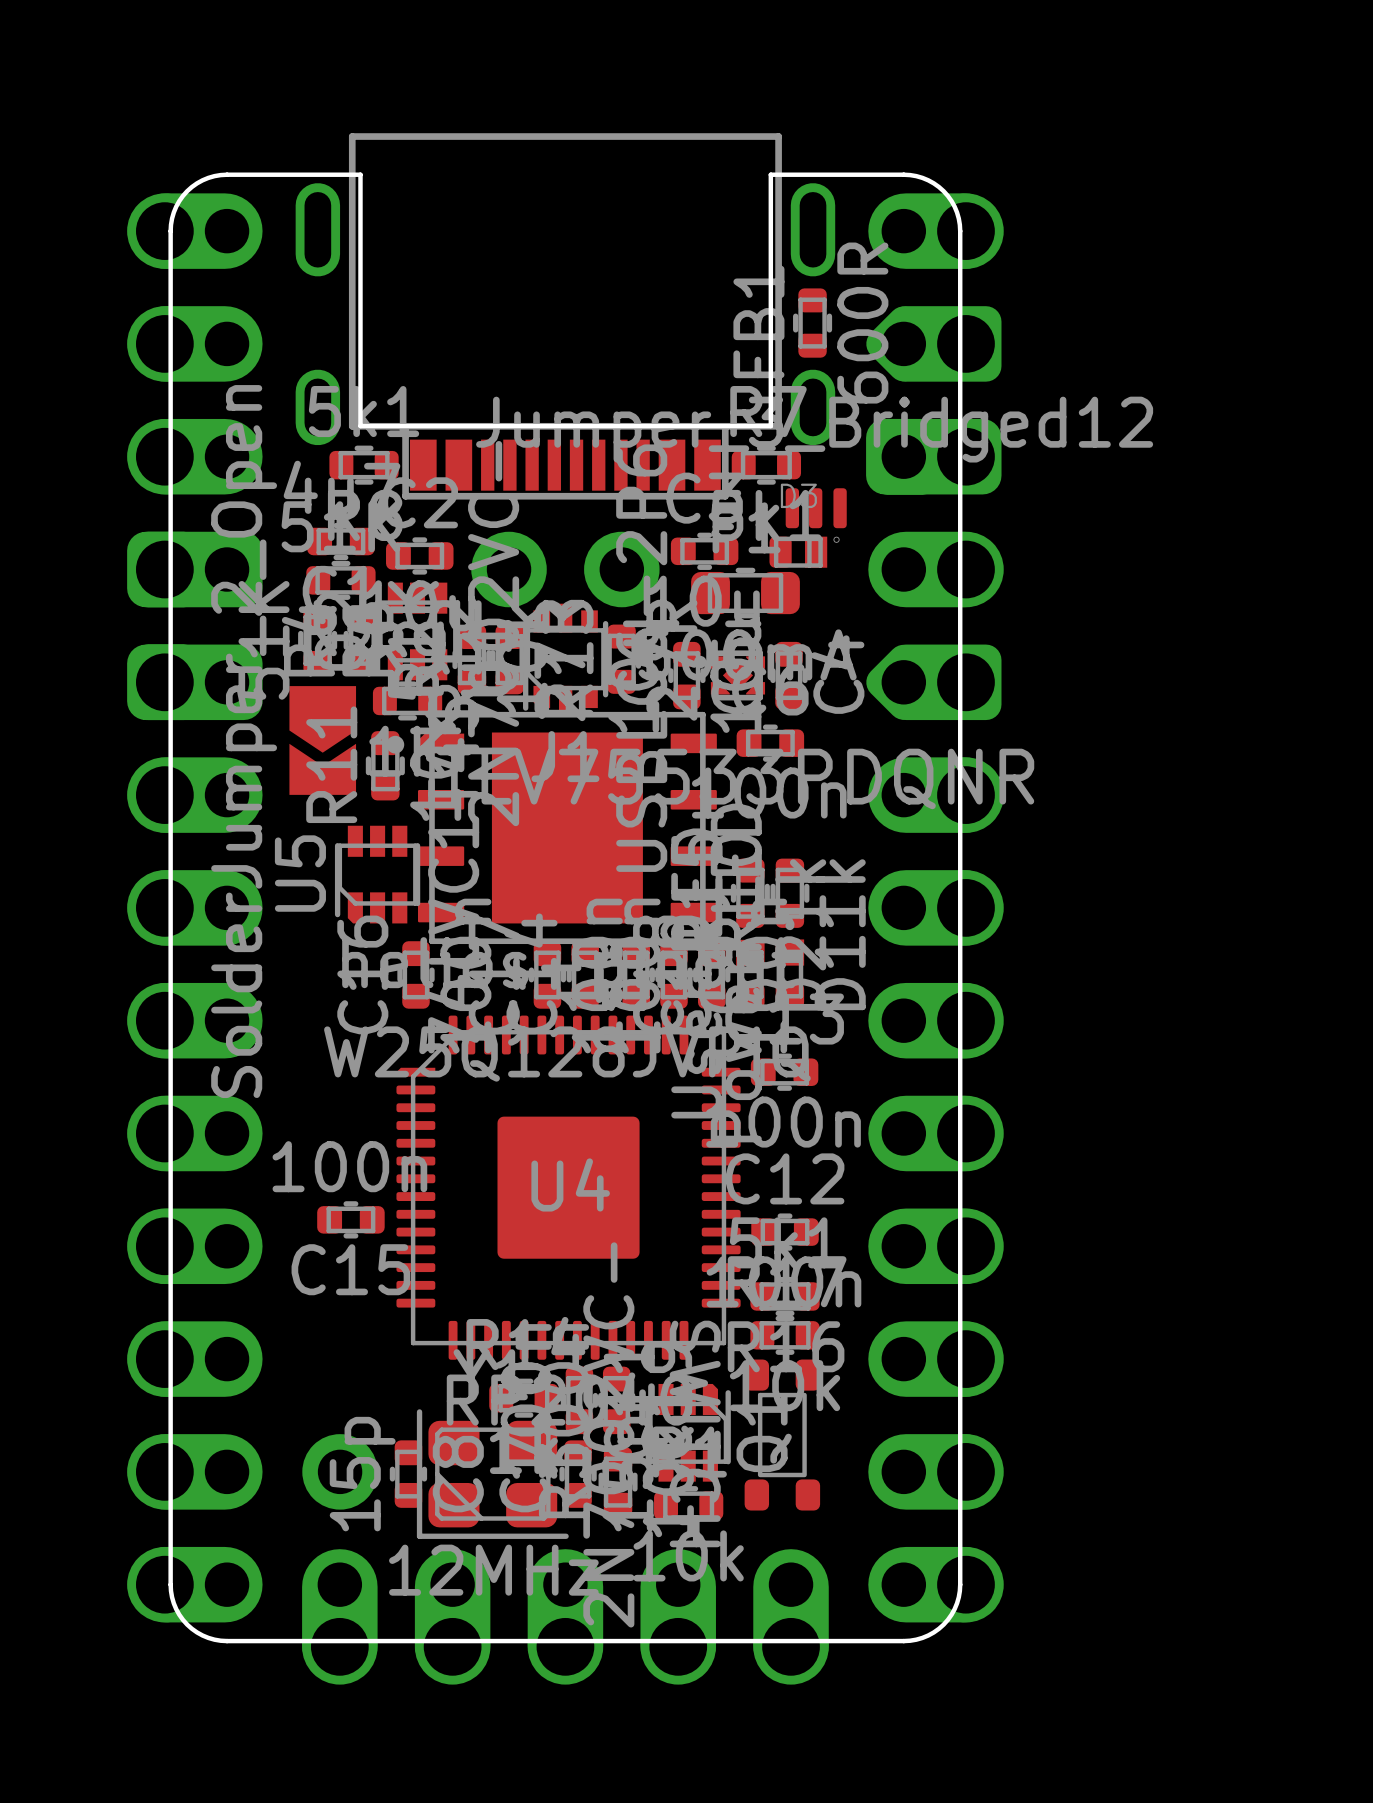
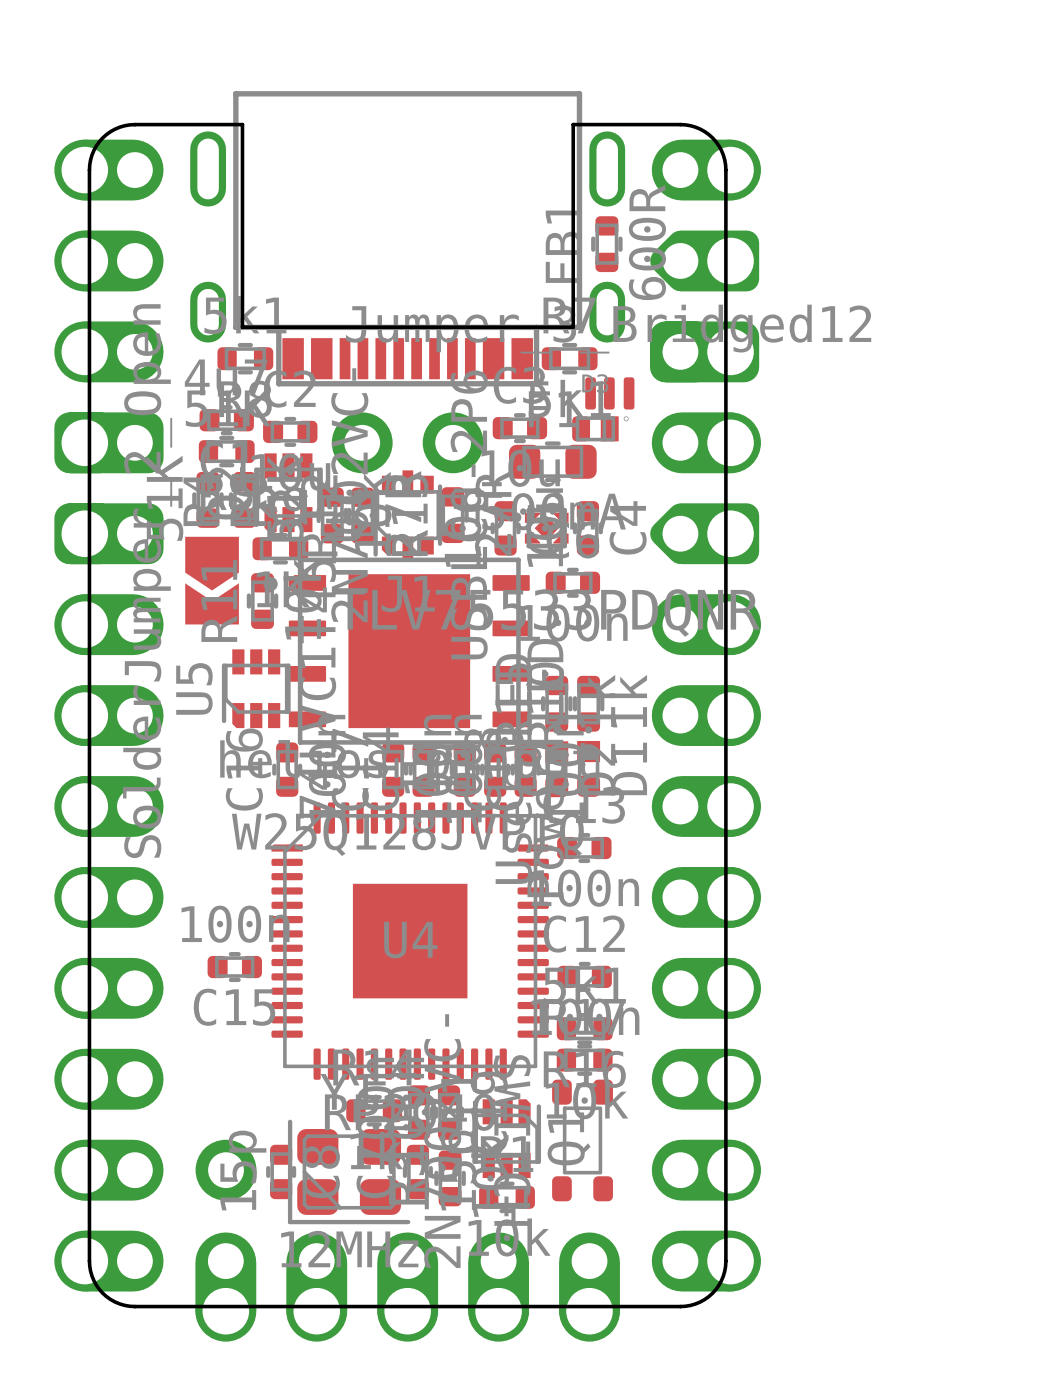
U4 footprint: [396, 1015, 741, 1360] -> [271, 802, 549, 1080]

